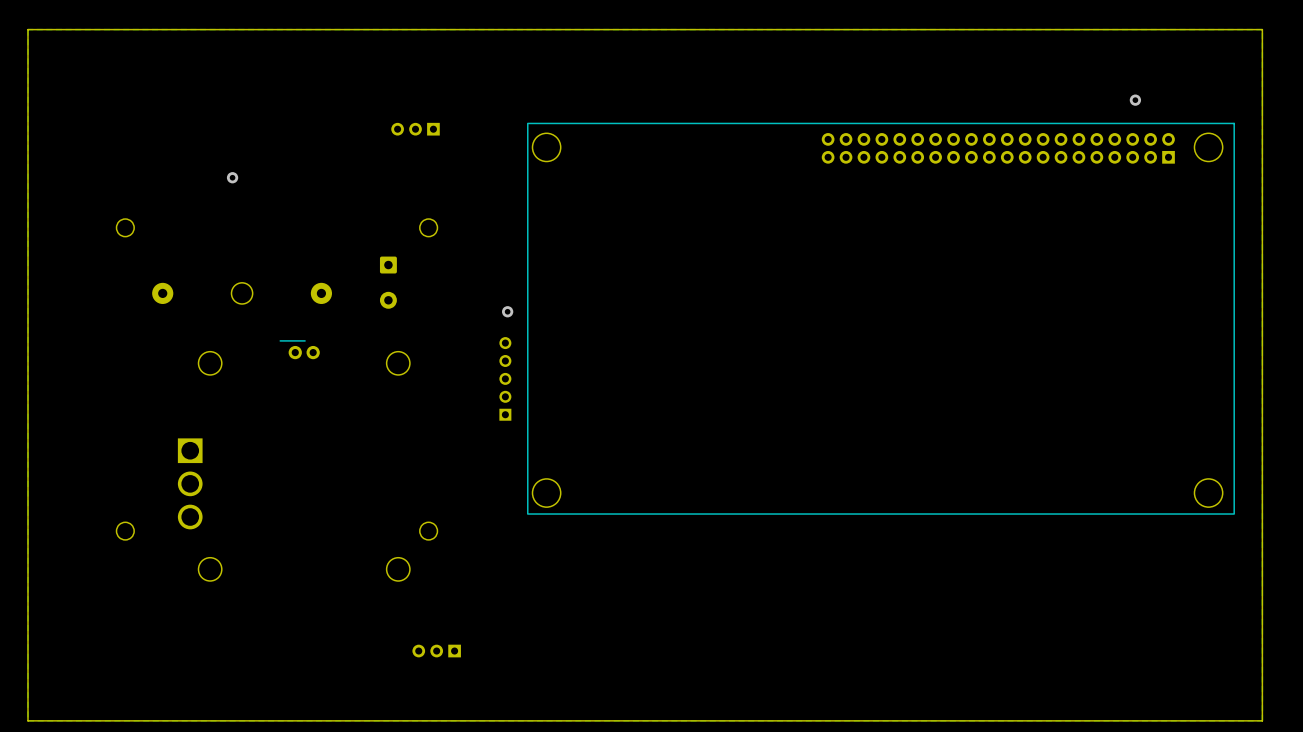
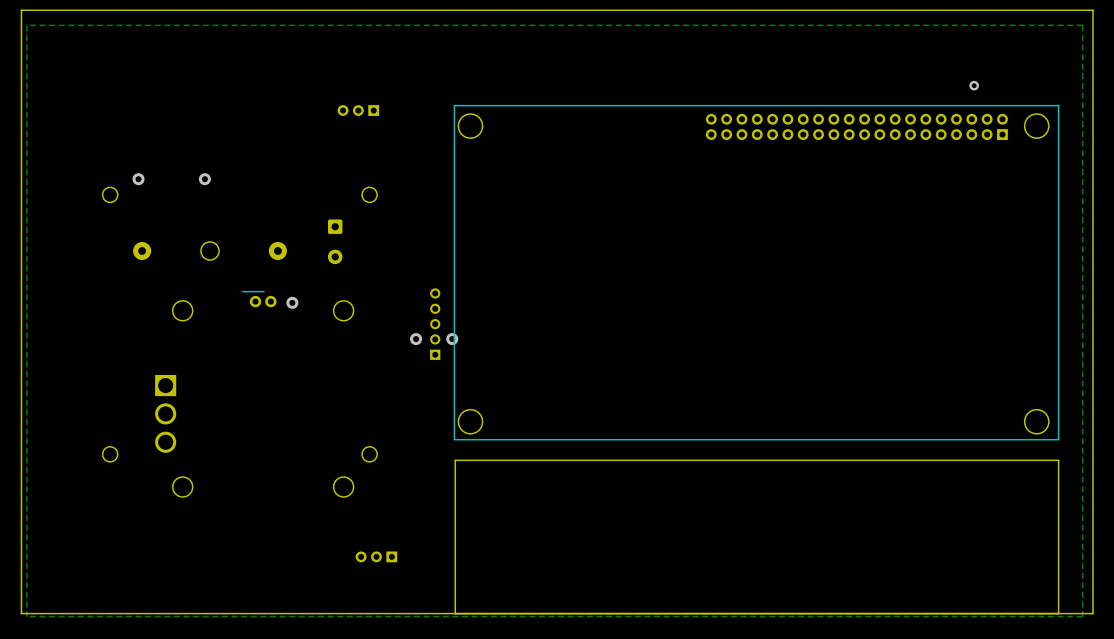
board edge: (1262, 29) (27, 29) (27, 720) (1262, 720) (1262, 29) -> (1093, 10) (1093, 613) (21, 613) (21, 10) (1093, 10)
via: (232, 177) -> none
via: none -> (138, 179)
via: none -> (204, 179)
via: (507, 311) -> none
via: none -> (292, 302)
via: none -> (416, 339)
via: none -> (452, 339)
board edge: none -> (1058, 613) (1058, 460) (455, 460) (455, 613)

